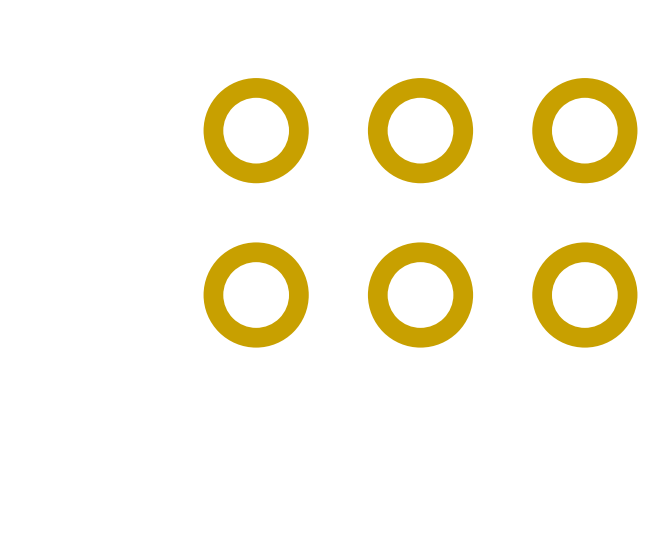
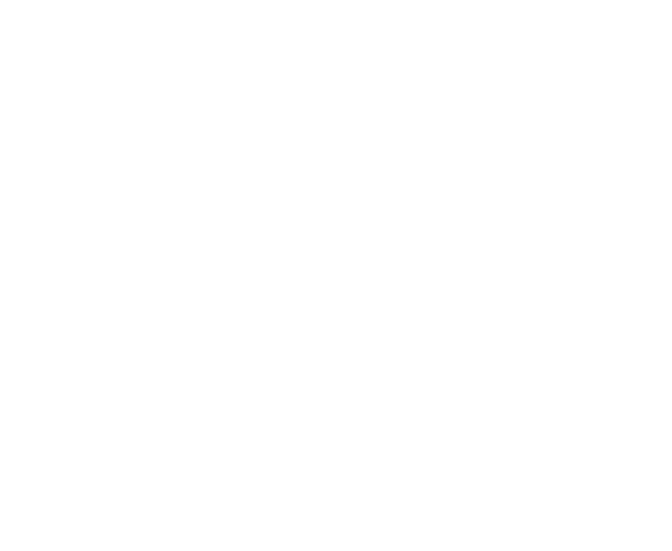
part: (256, 130) -> none
part: (420, 130) -> none
part: (584, 130) -> none
part: (256, 295) -> none
part: (420, 295) -> none
part: (584, 295) -> none

